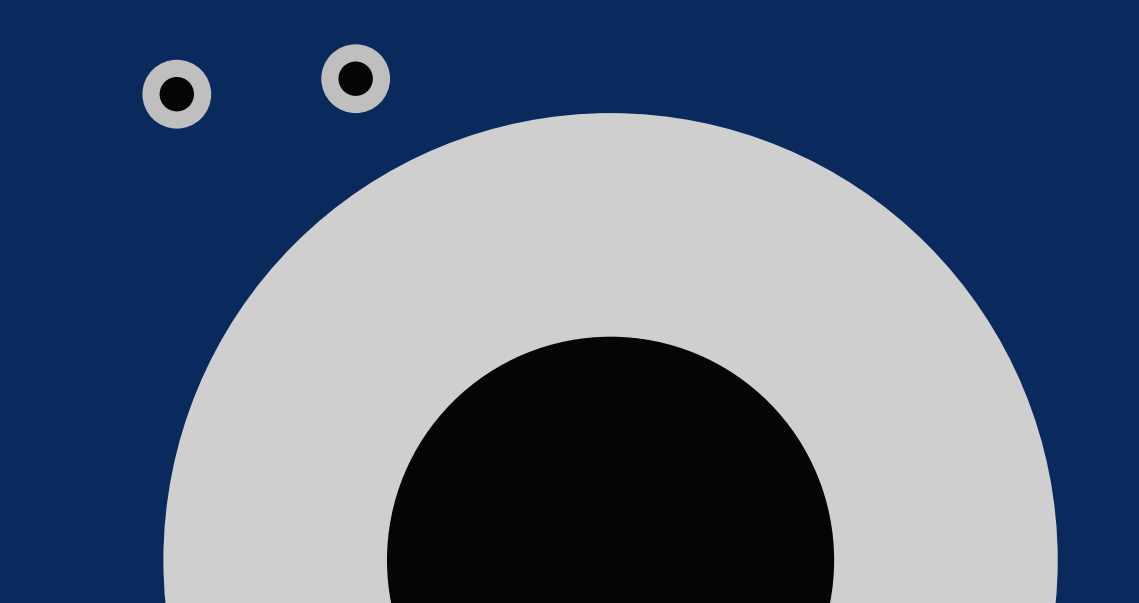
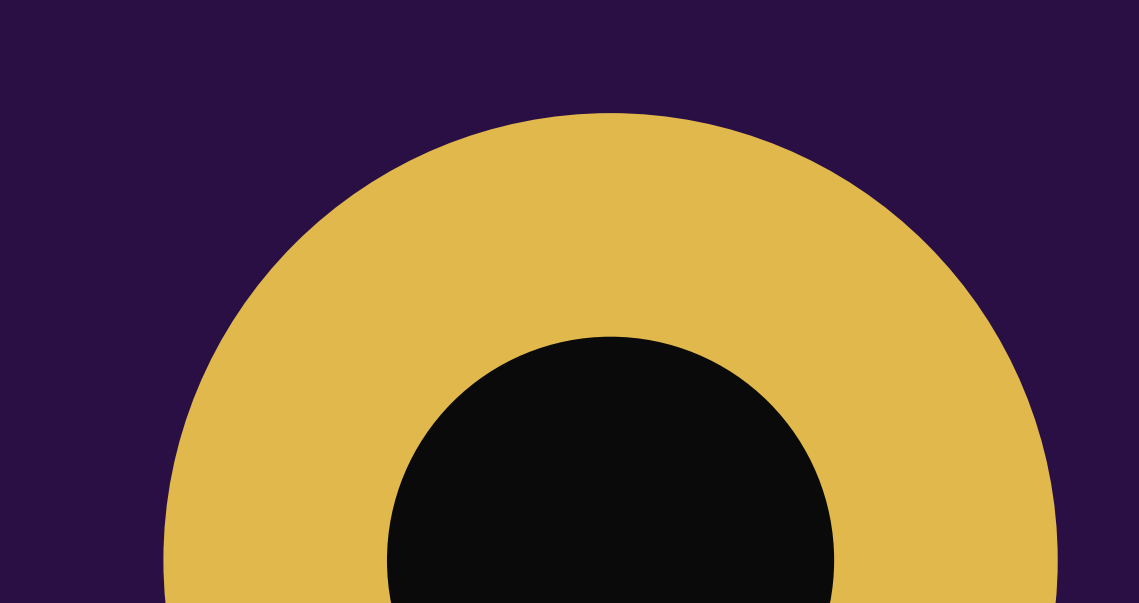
via: (355, 78) -> none
via: (176, 94) -> none

